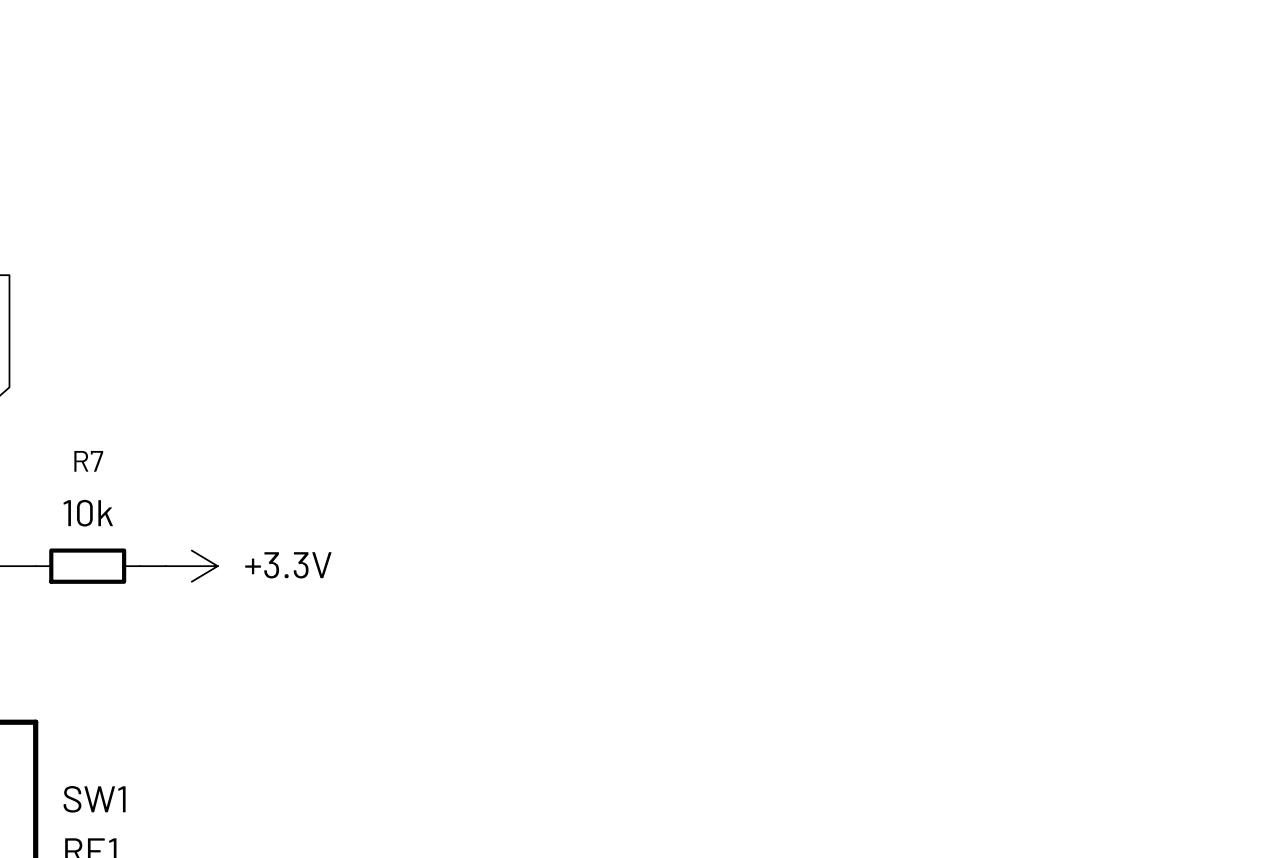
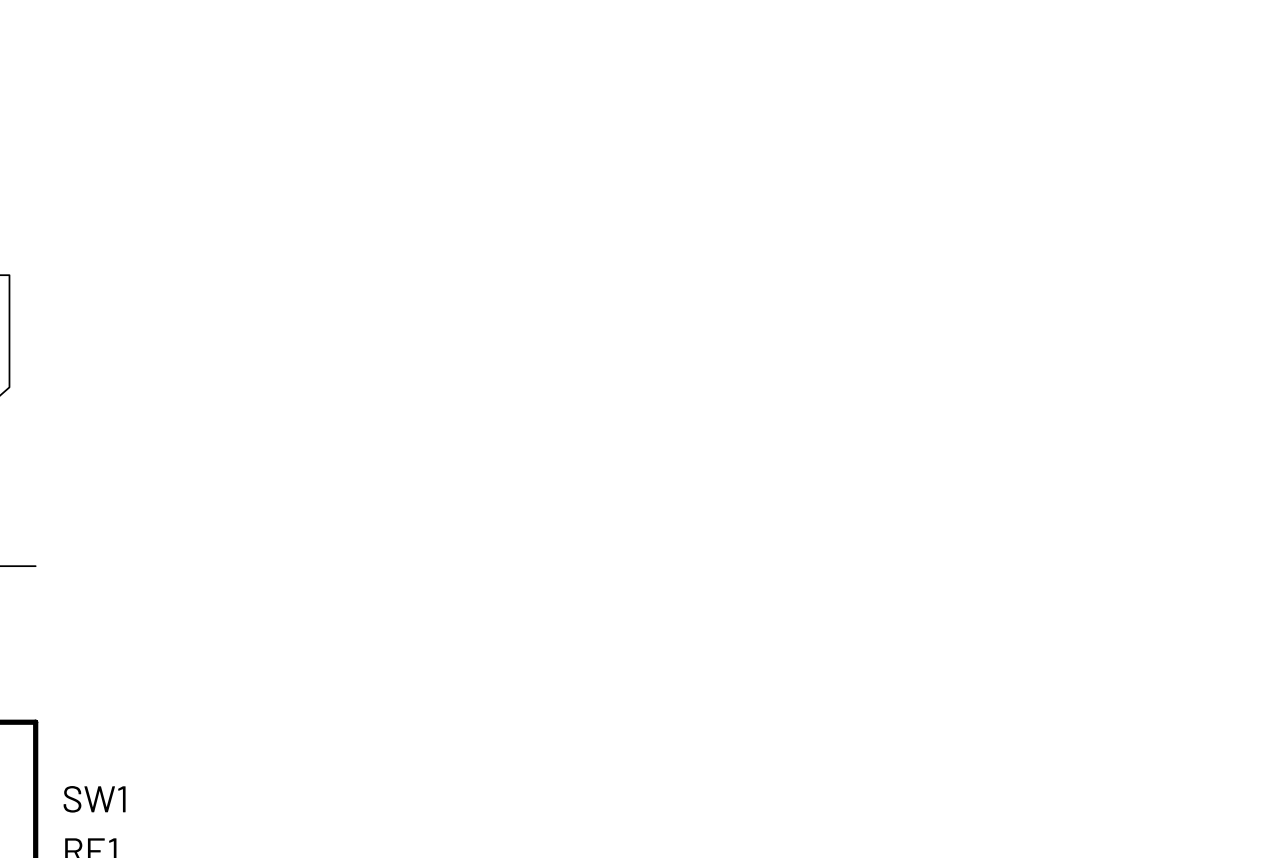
R7: 10k (87, 566) -> none
wire: (139, 566) (165, 566) -> none
power symbol: +3.3V (191, 566) -> none

